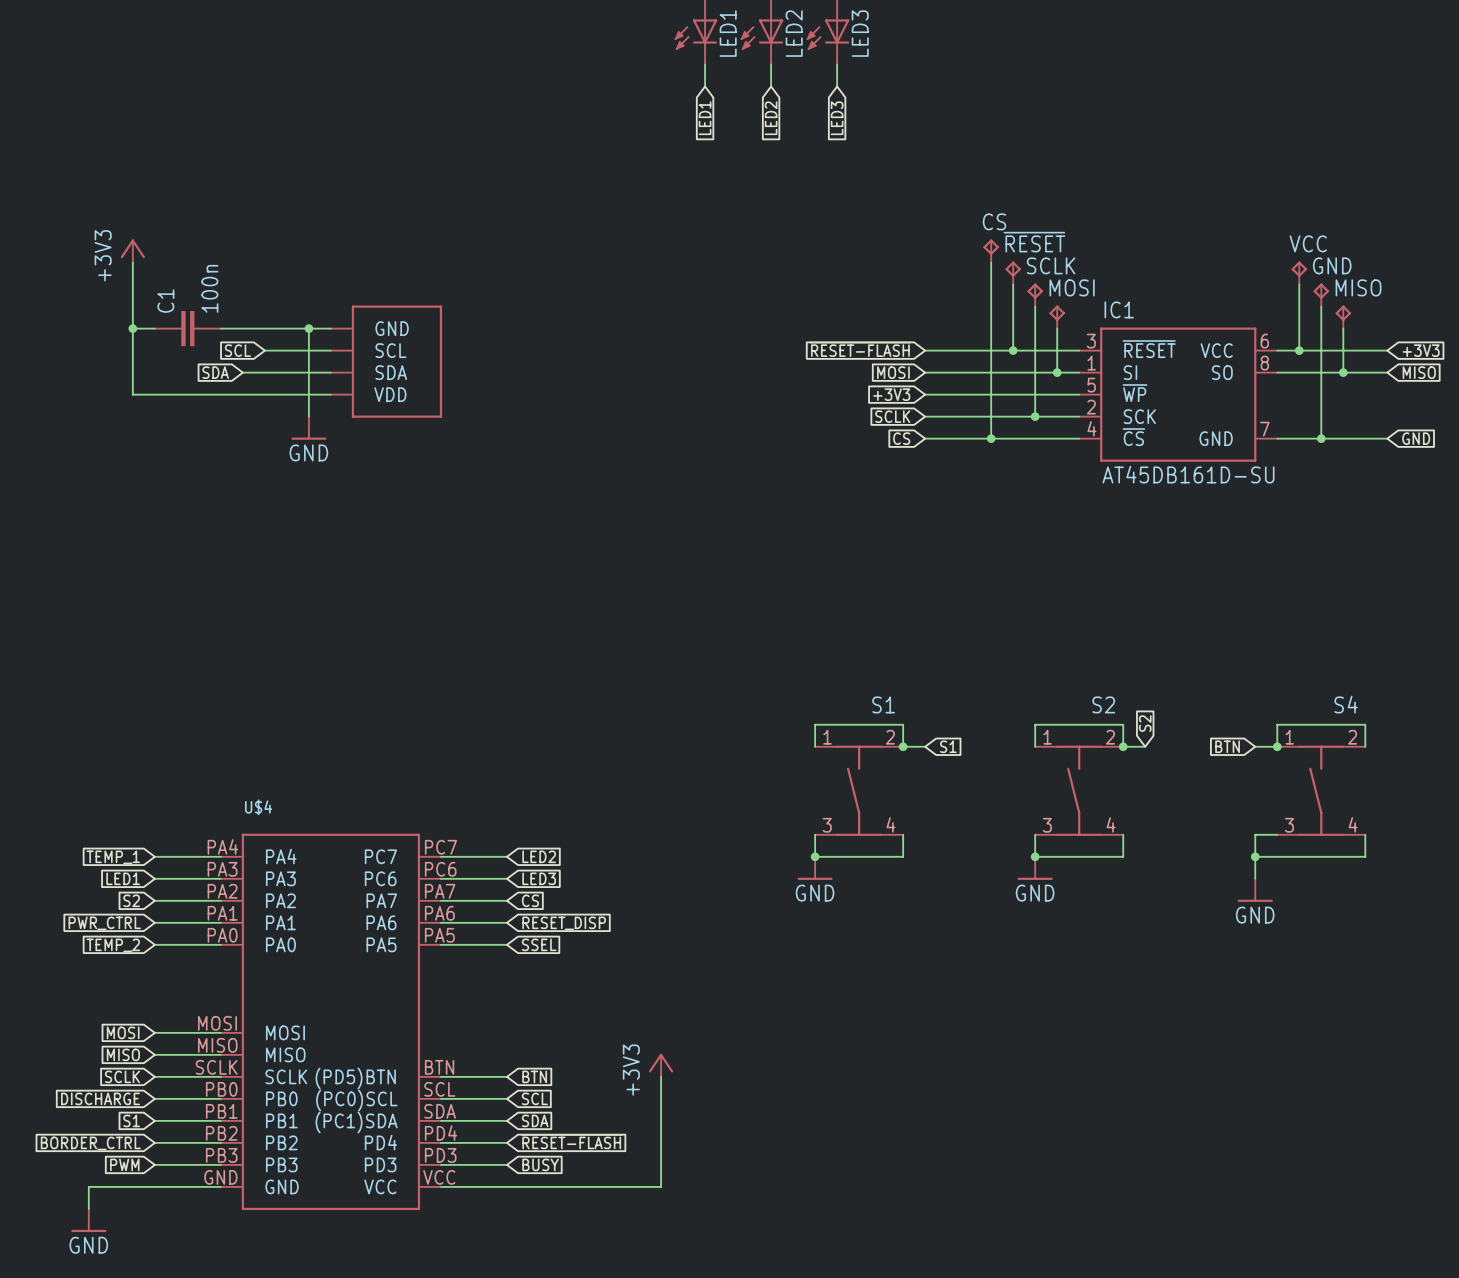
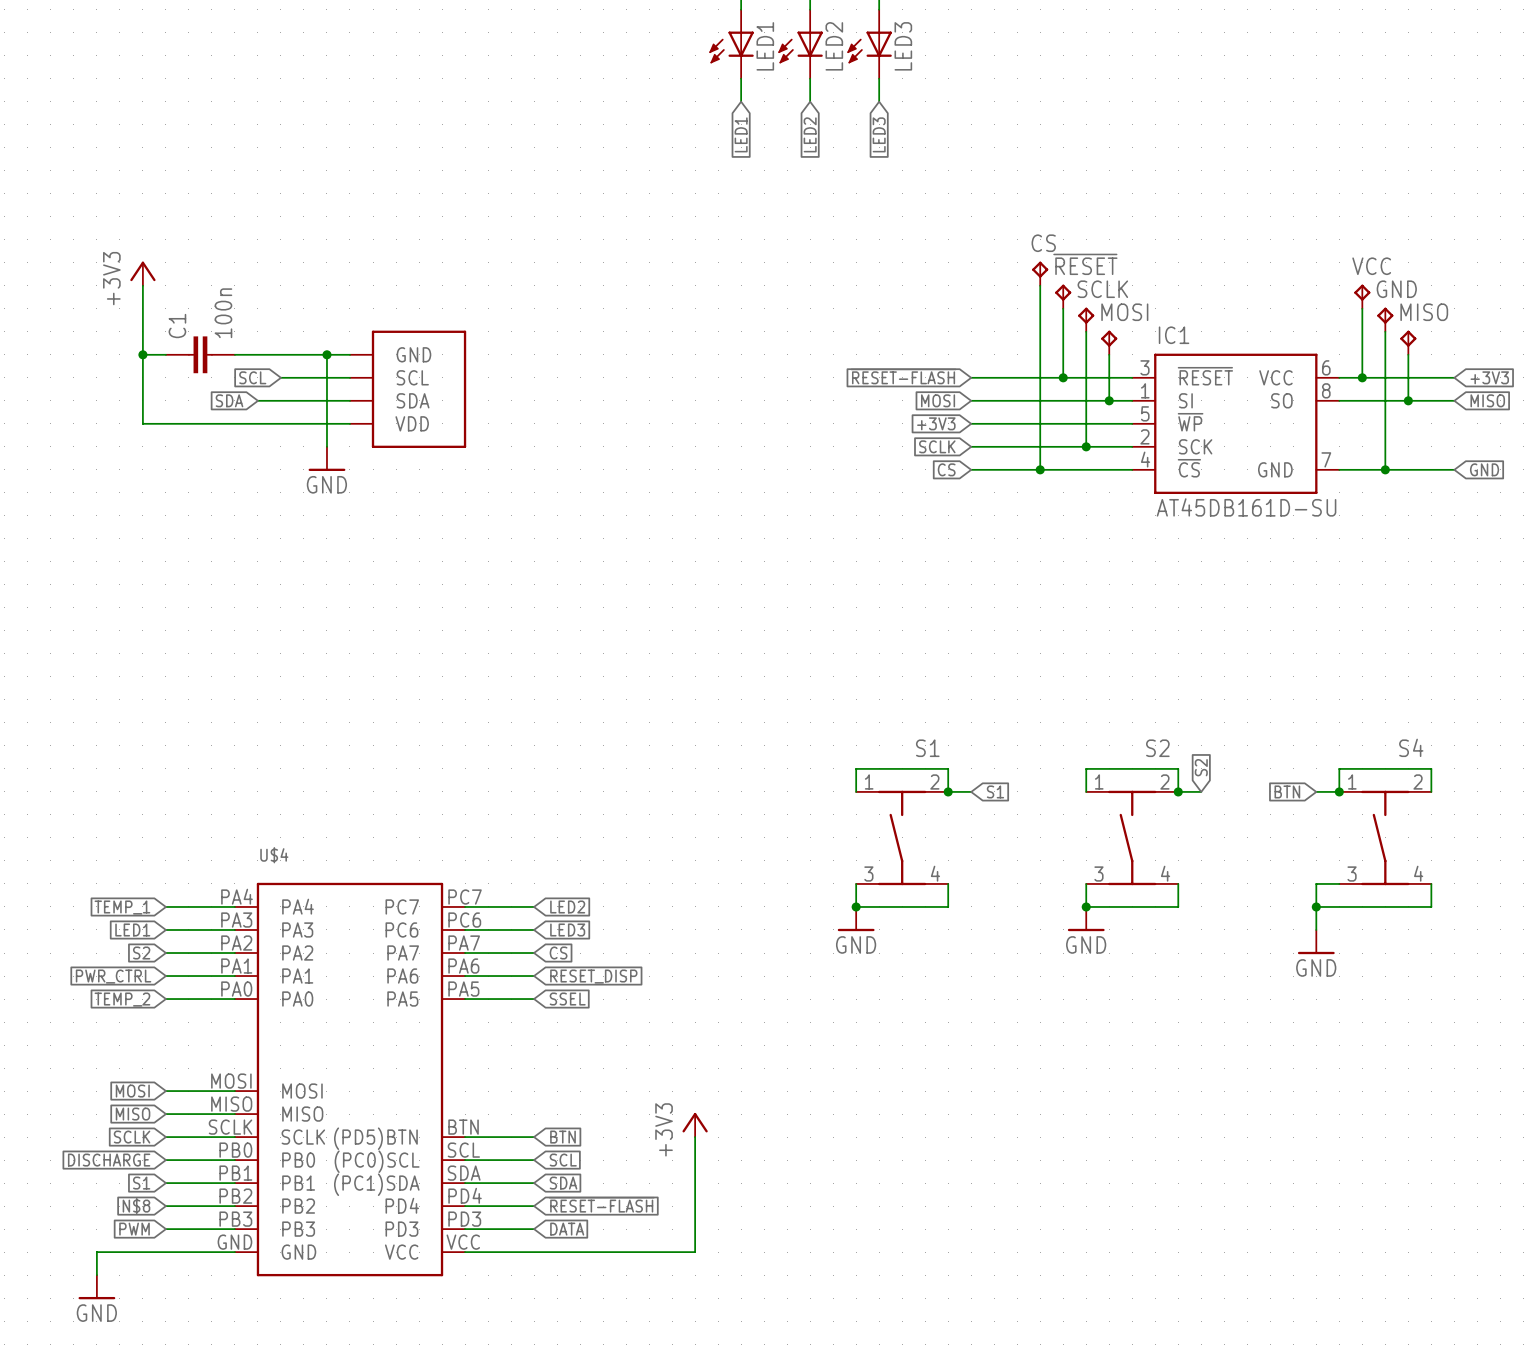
global label: BORDER_CTRL (90, 1143) -> N$8 (136, 1206)
global label: BUSY (540, 1164) -> DATA (567, 1229)

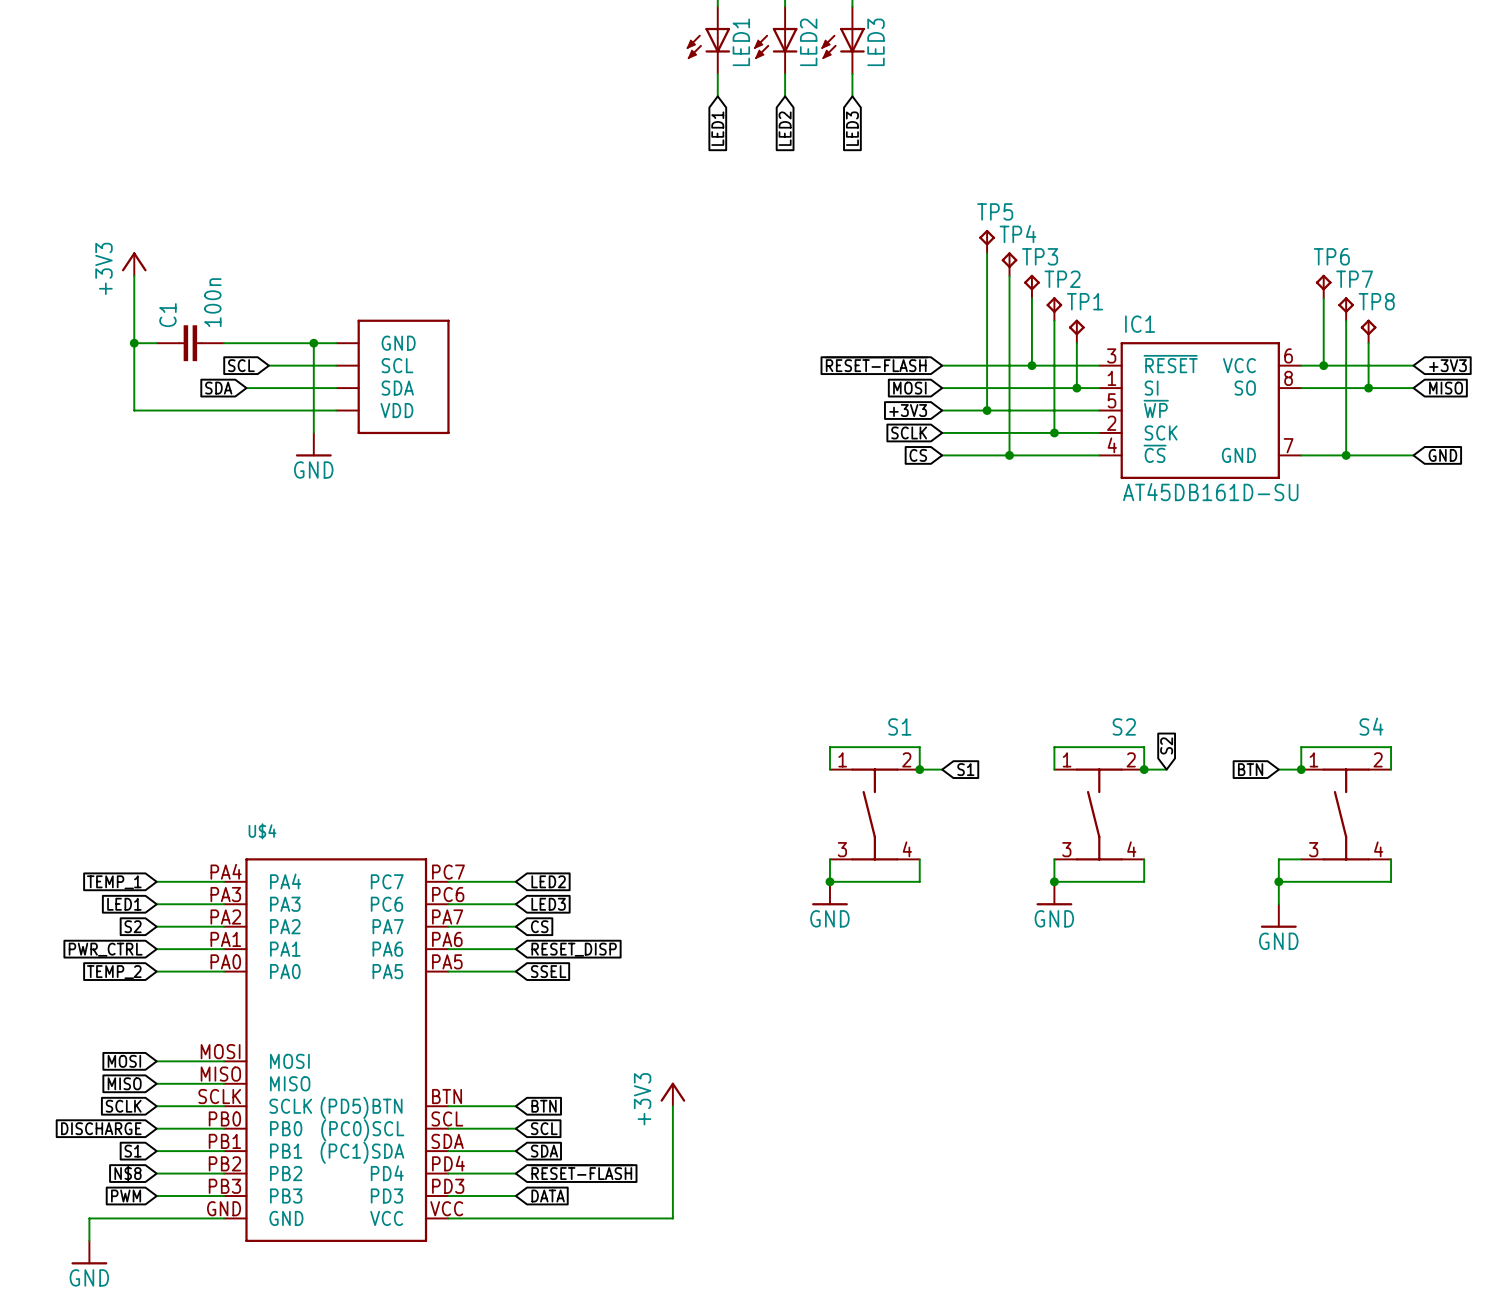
CS name: CS (1043, 243) -> TP4 (1017, 233)
TP5: none -> (987, 241)
wire: none -> (987, 253) (987, 410)
~{RESET} name: ~{RESET} (1085, 264) -> TP3 (1040, 256)
VCC name: VCC (1371, 266) -> TP6 (1331, 256)
SCLK name: SCLK (1102, 289) -> TP2 (1062, 279)
GND name: GND (1396, 289) -> TP7 (1354, 279)
MOSI name: MOSI (1124, 312) -> TP1 (1084, 301)
MISO name: MISO (1424, 312) -> TP8 (1376, 301)
junction: none -> (987, 410)

